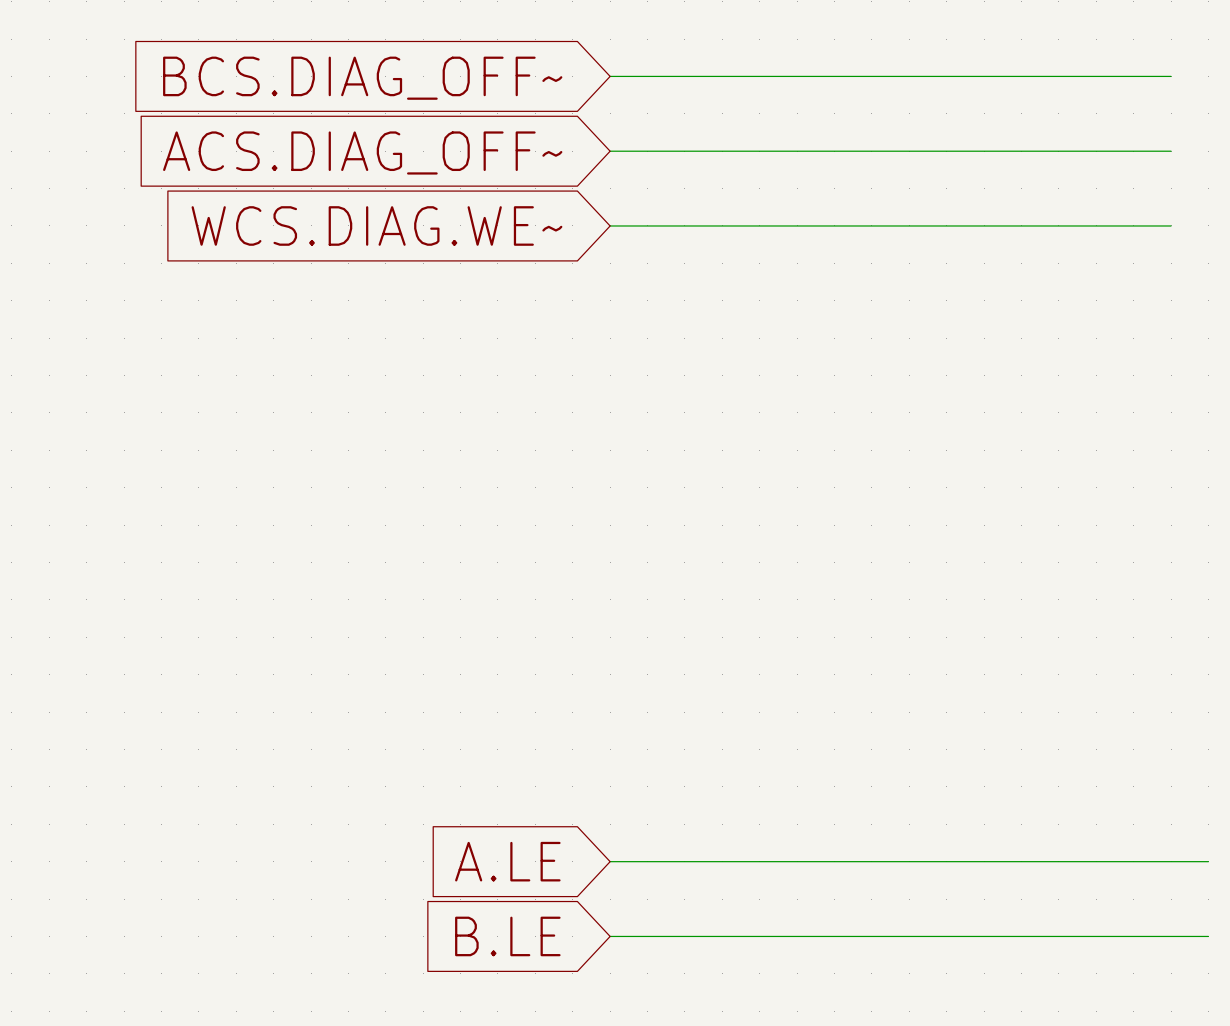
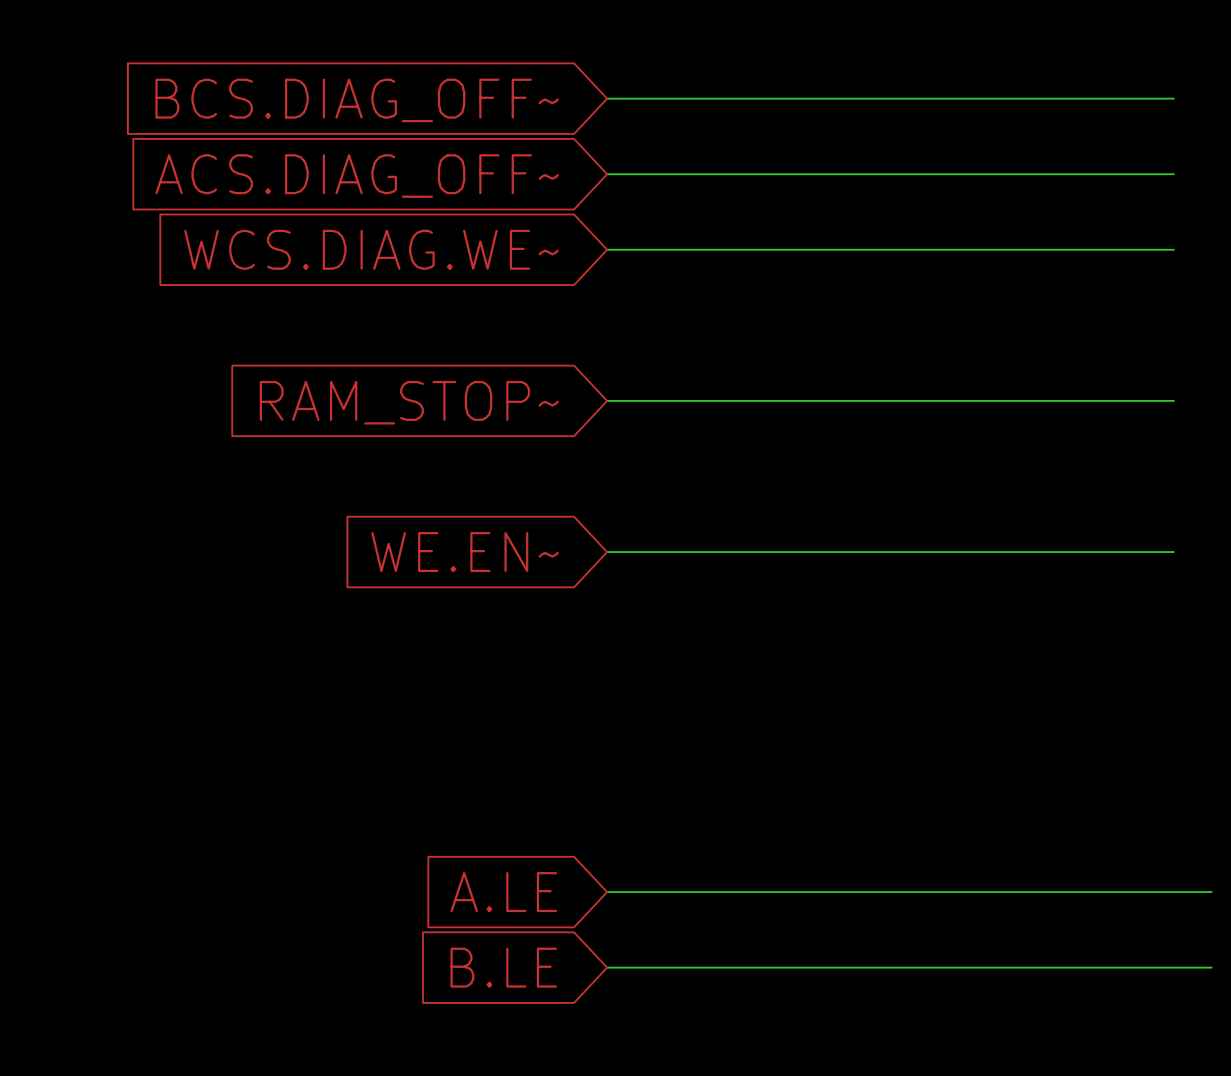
wire: none -> (607, 400) (1173, 400)
global label: none -> RAM_STOP~ (409, 402)
global label: none -> WE.EN~ (465, 552)
wire: none -> (607, 552) (1173, 552)

